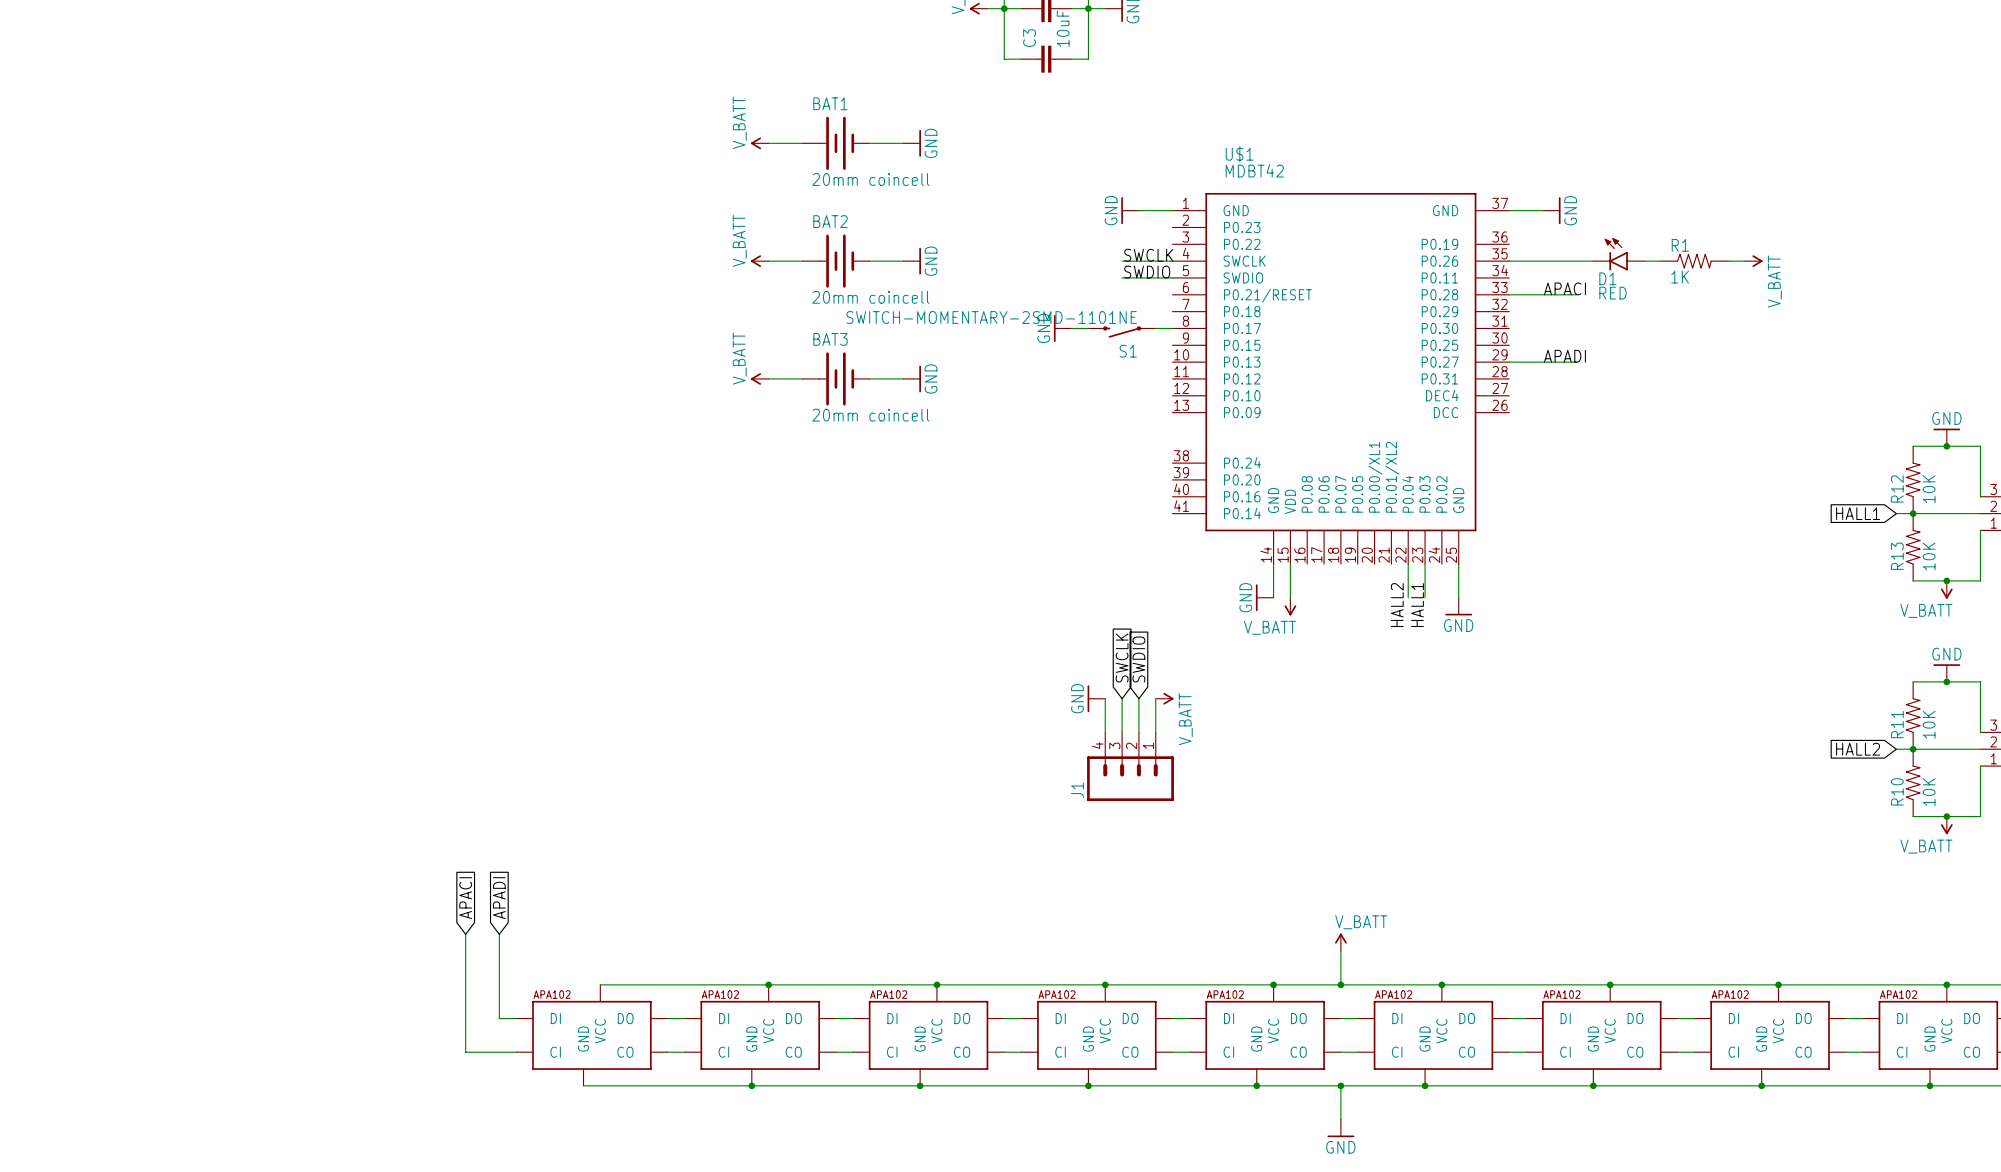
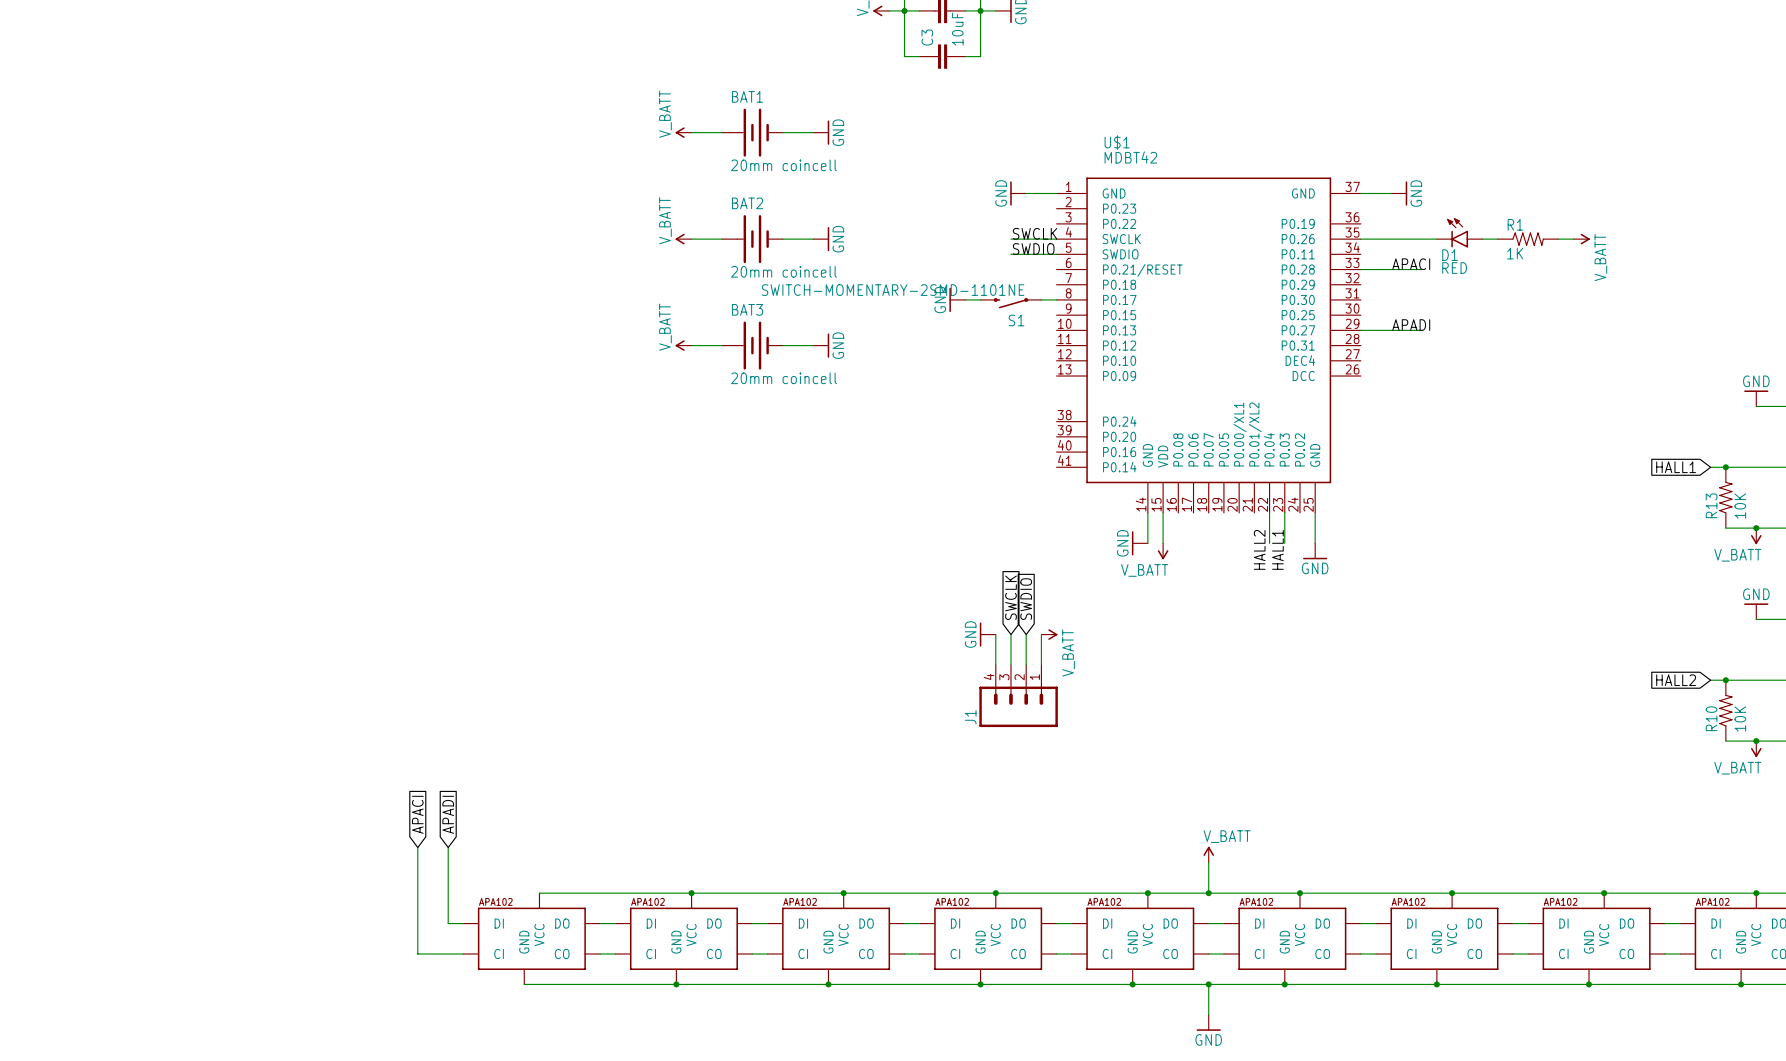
wire: (1913, 446) (1946, 446) -> none
junction: (1946, 446) -> none
R12: 10K (1913, 479) -> none
wire: (1913, 681) (1946, 681) -> none
junction: (1946, 681) -> none
R11: 10K (1913, 715) -> none

